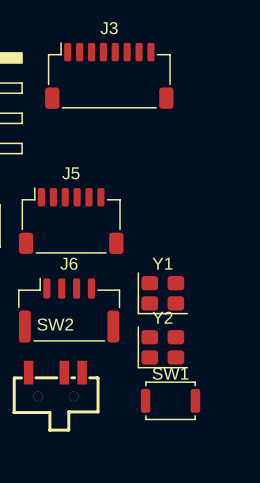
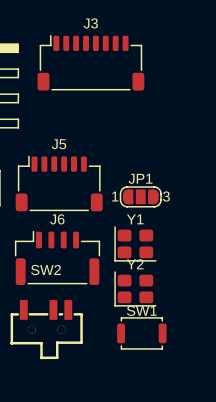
JP1: none -> (140, 196)

